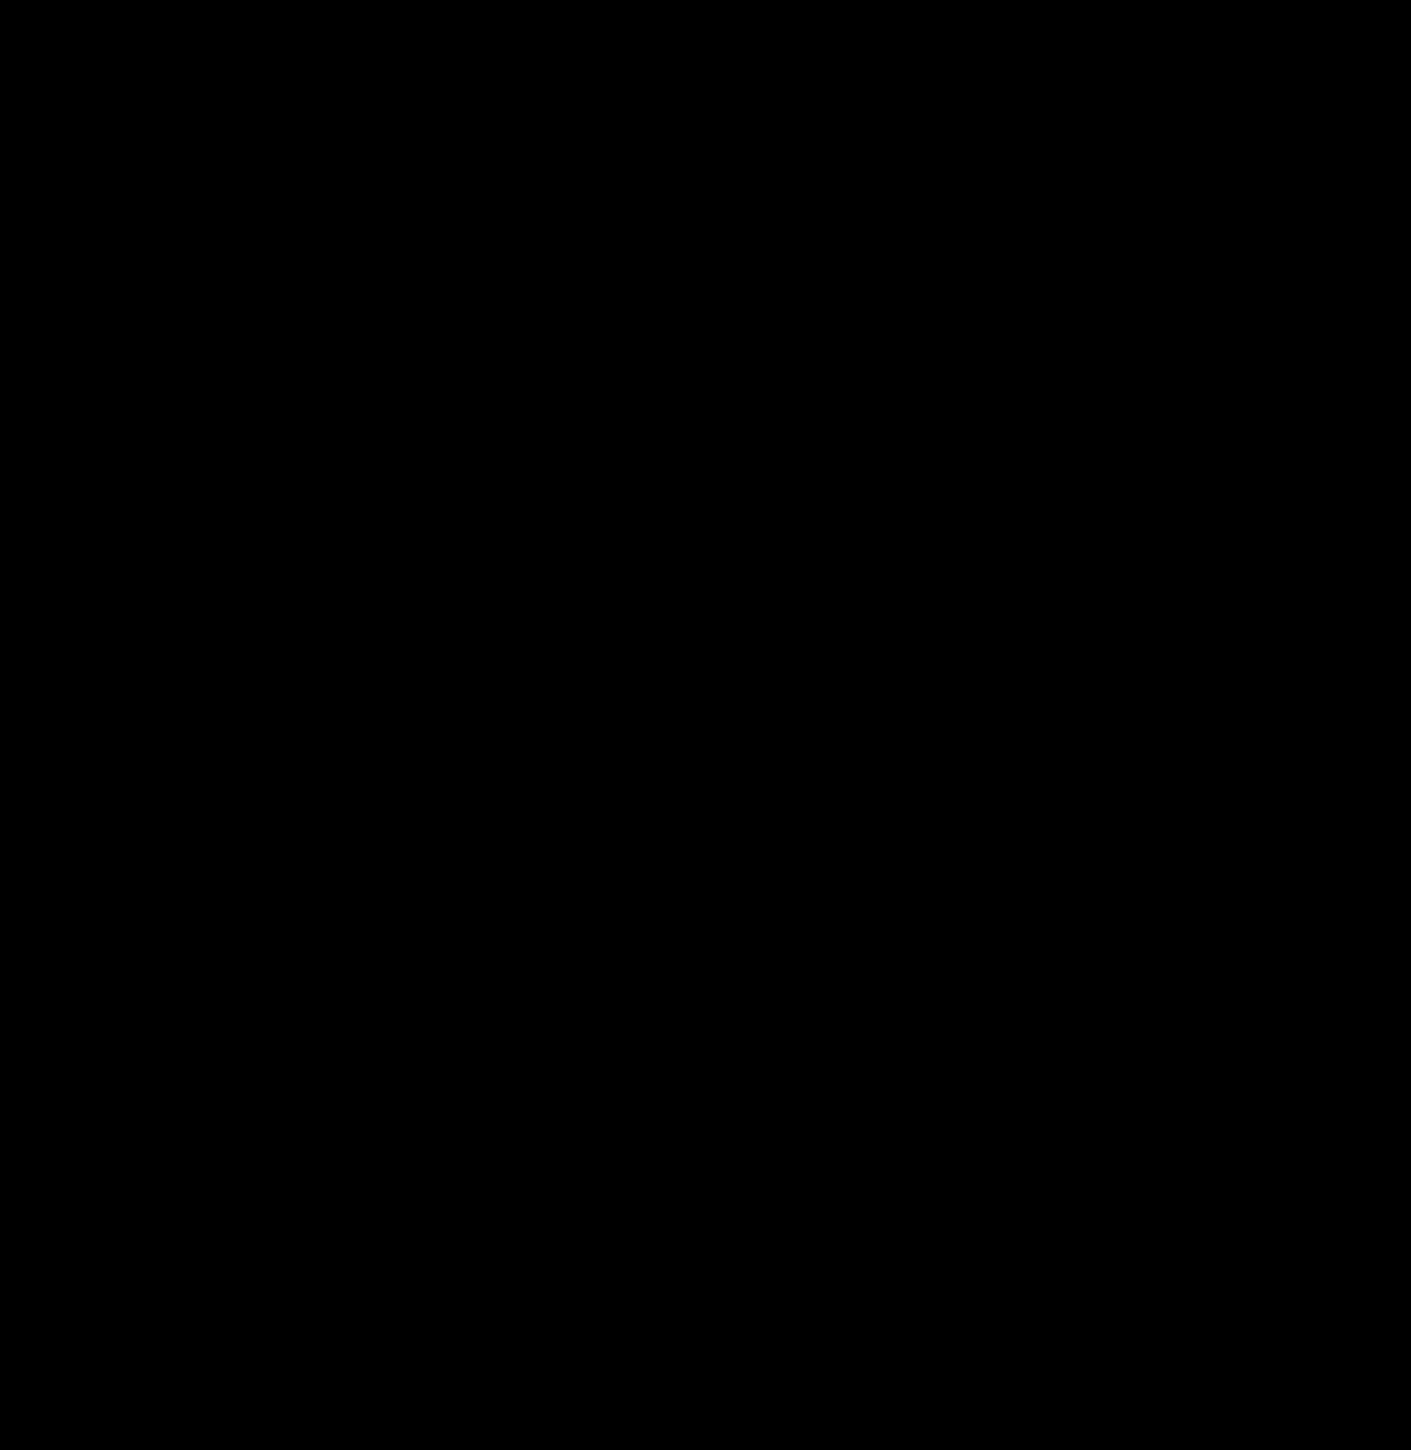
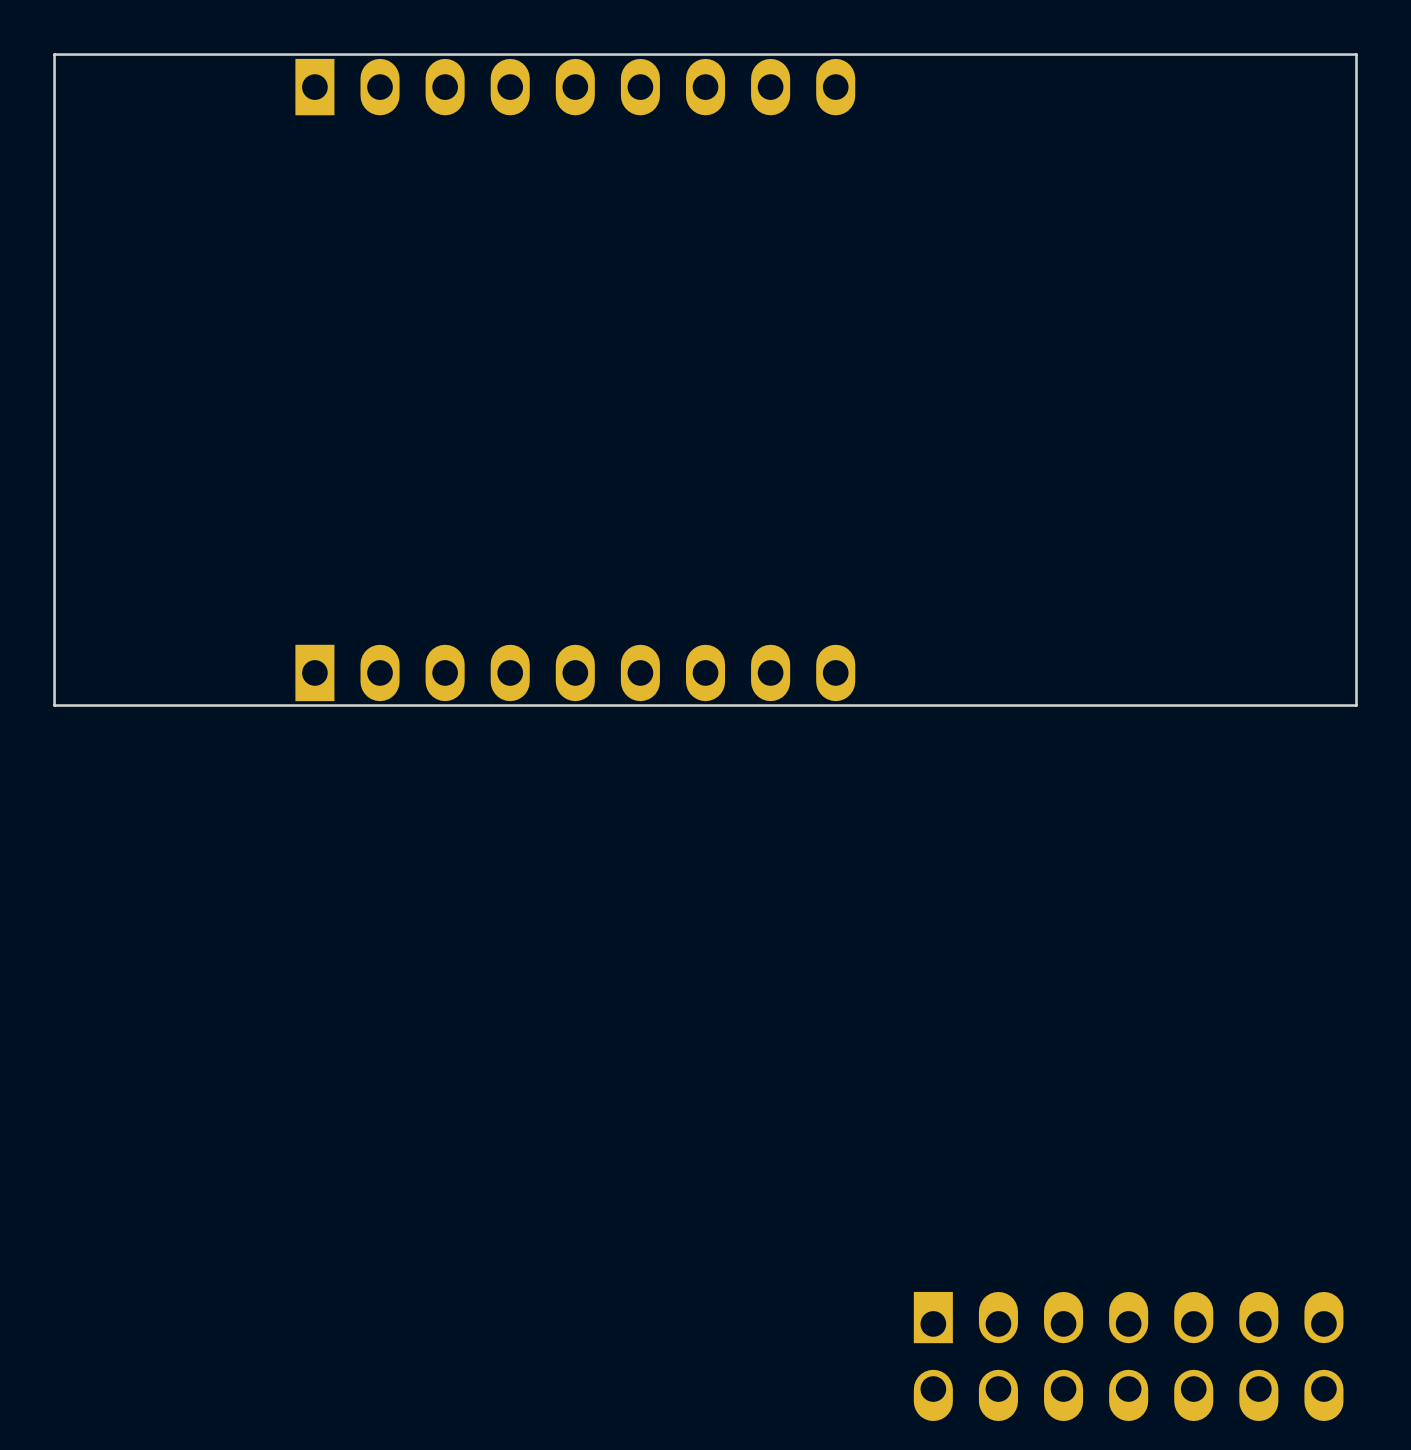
board edge: none -> (1356, 54) (54, 54) (54, 705) (1356, 705) (1356, 54)
part: none -> (575, 87)
part: none -> (575, 672)
part: none -> (1128, 1356)

